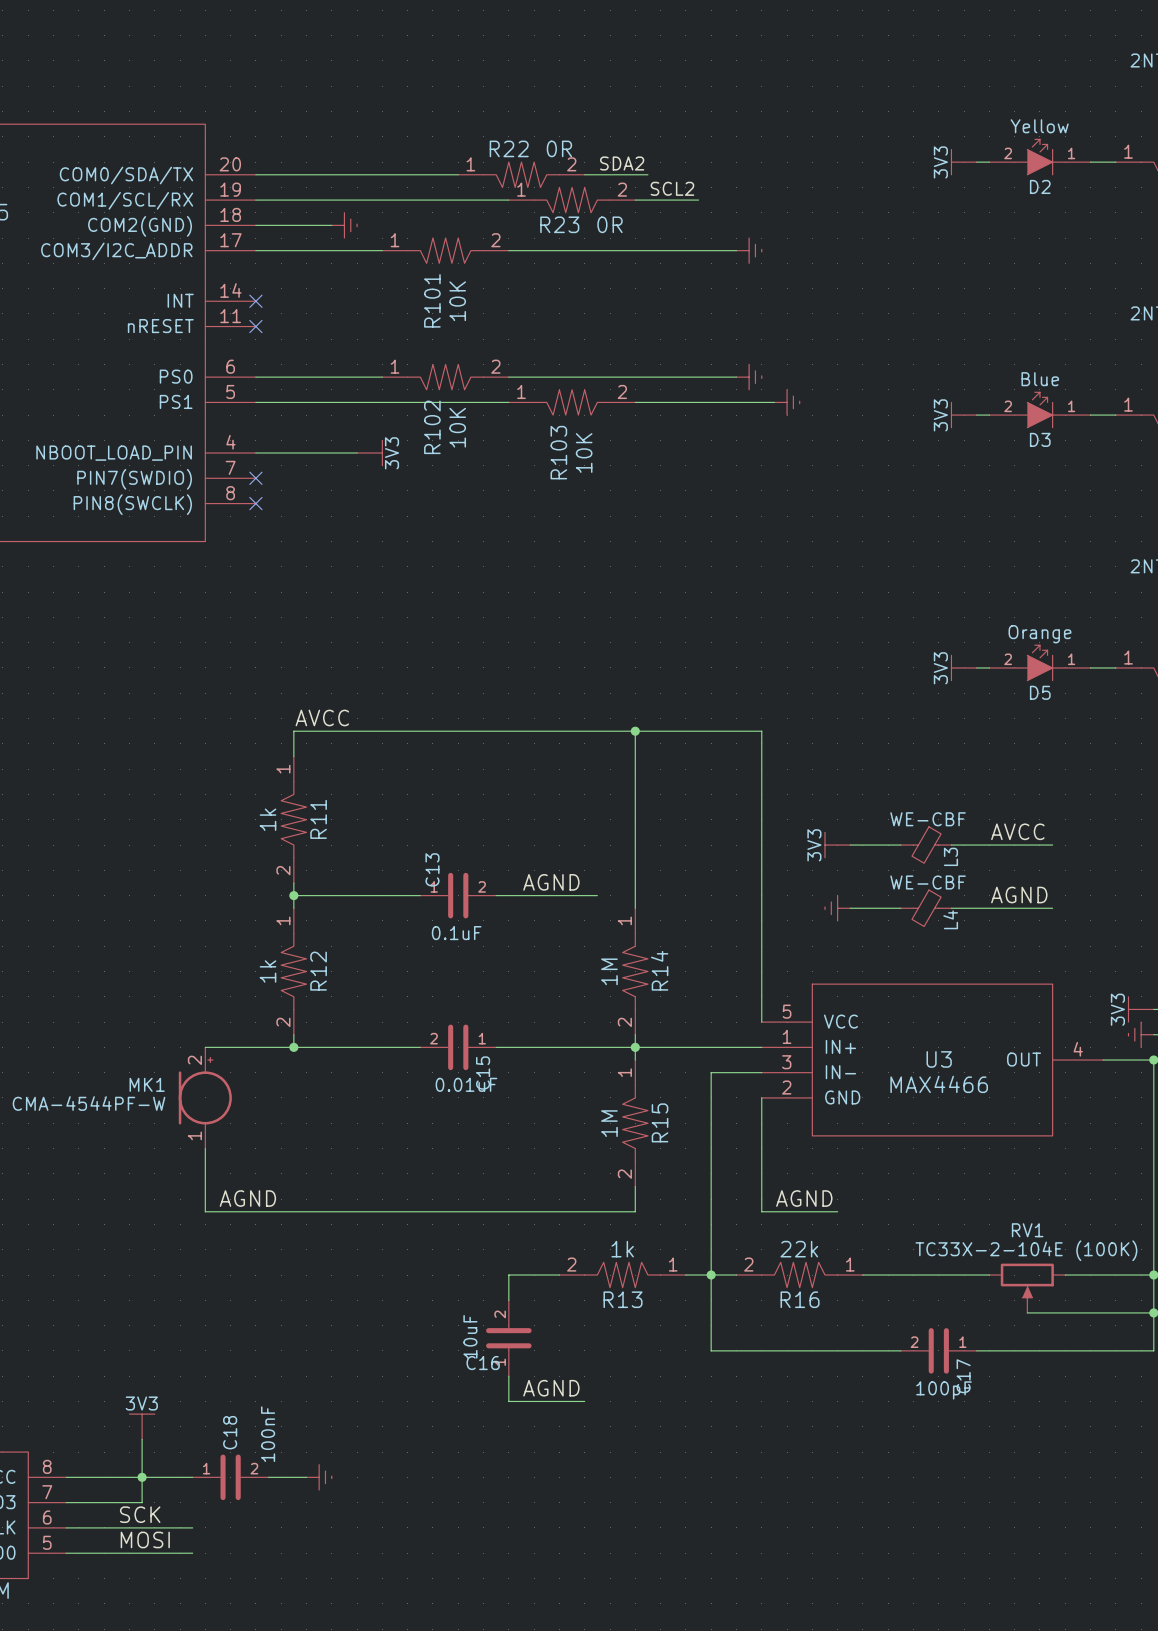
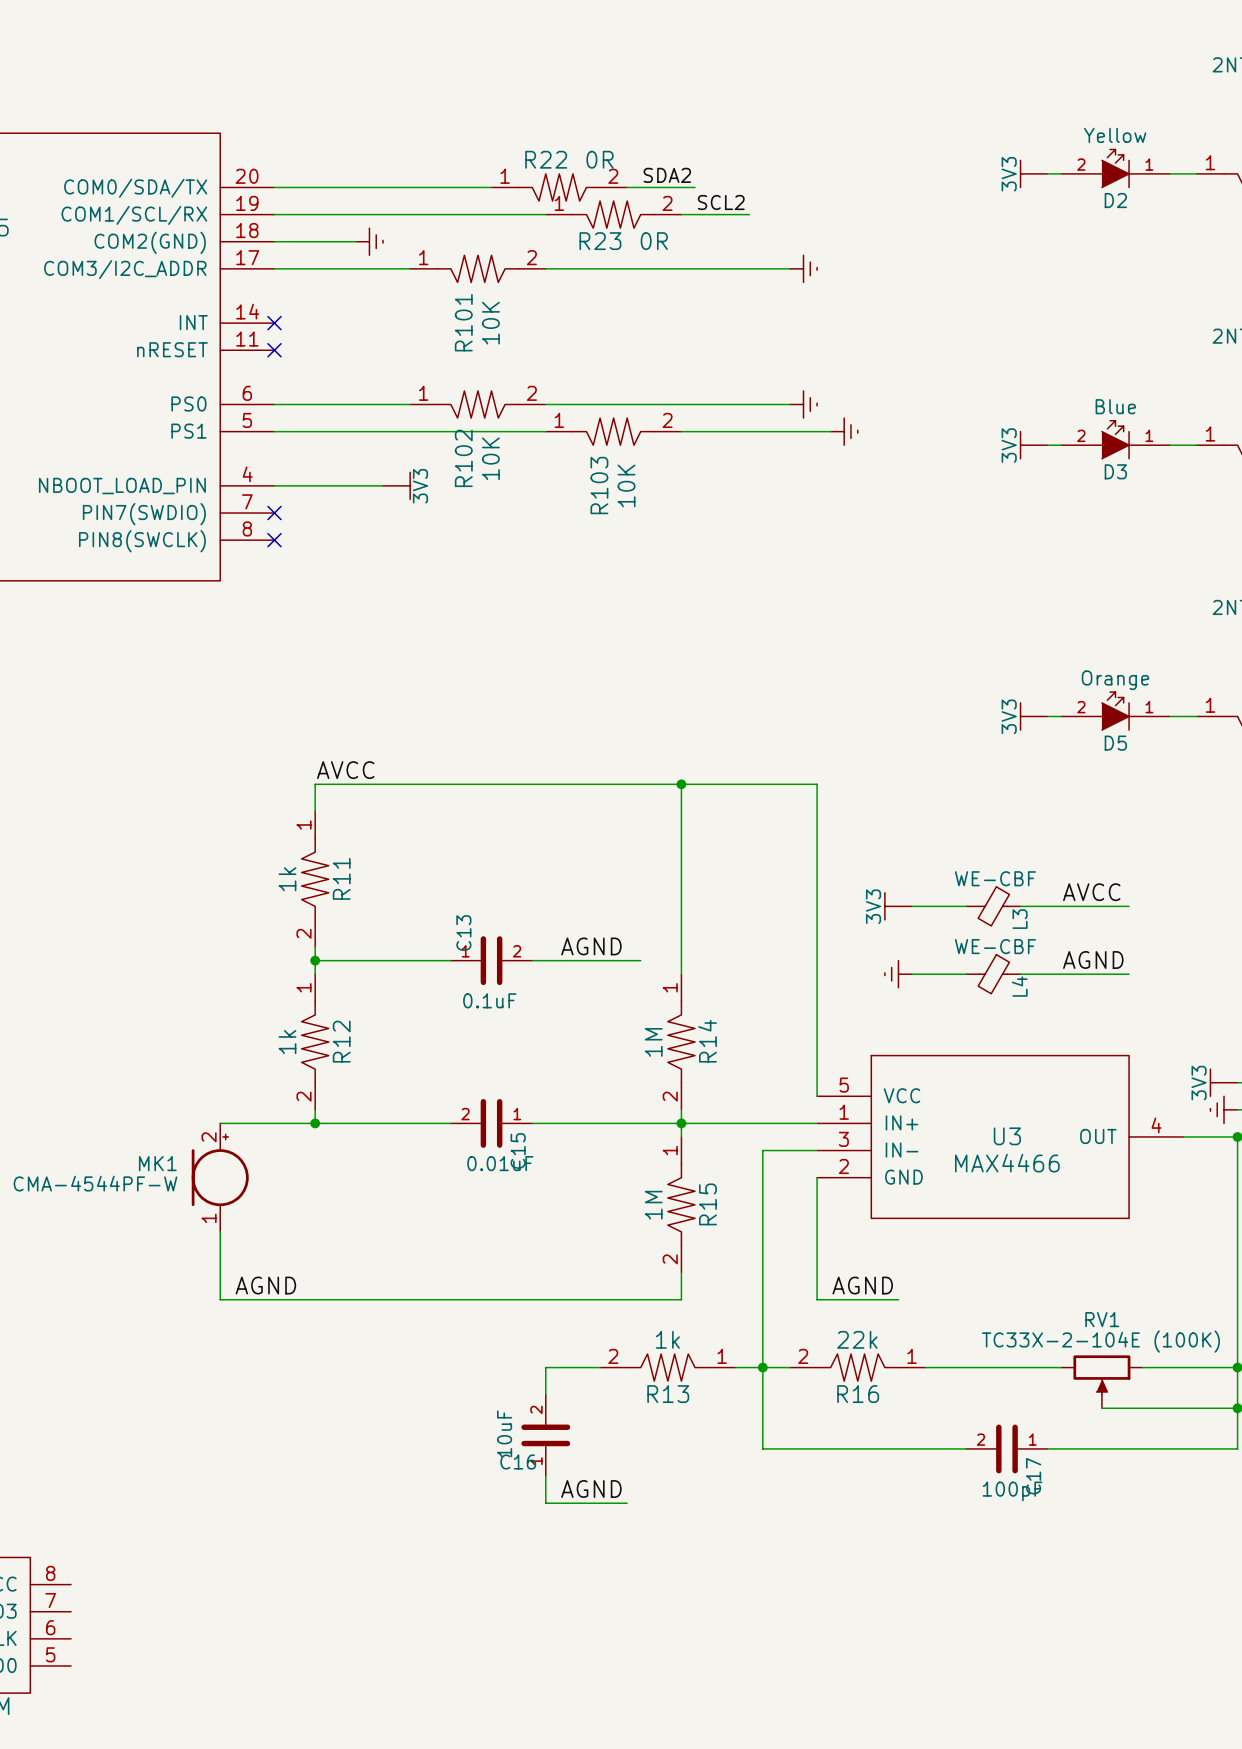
power symbol: 3V3 (142, 1426) -> none
wire: (142, 1439) (142, 1502) (66, 1502) -> none
wire: (66, 1477) (192, 1477) -> none
junction: (142, 1477) -> none
C18: 100nF (230, 1477) -> none
wire: (268, 1477) (306, 1477) -> none
power symbol: (319, 1477) -> none
label: SCK (140, 1514) -> none
wire: (66, 1527) (192, 1527) -> none
label: MOSI (145, 1539) -> none
wire: (66, 1553) (192, 1553) -> none

